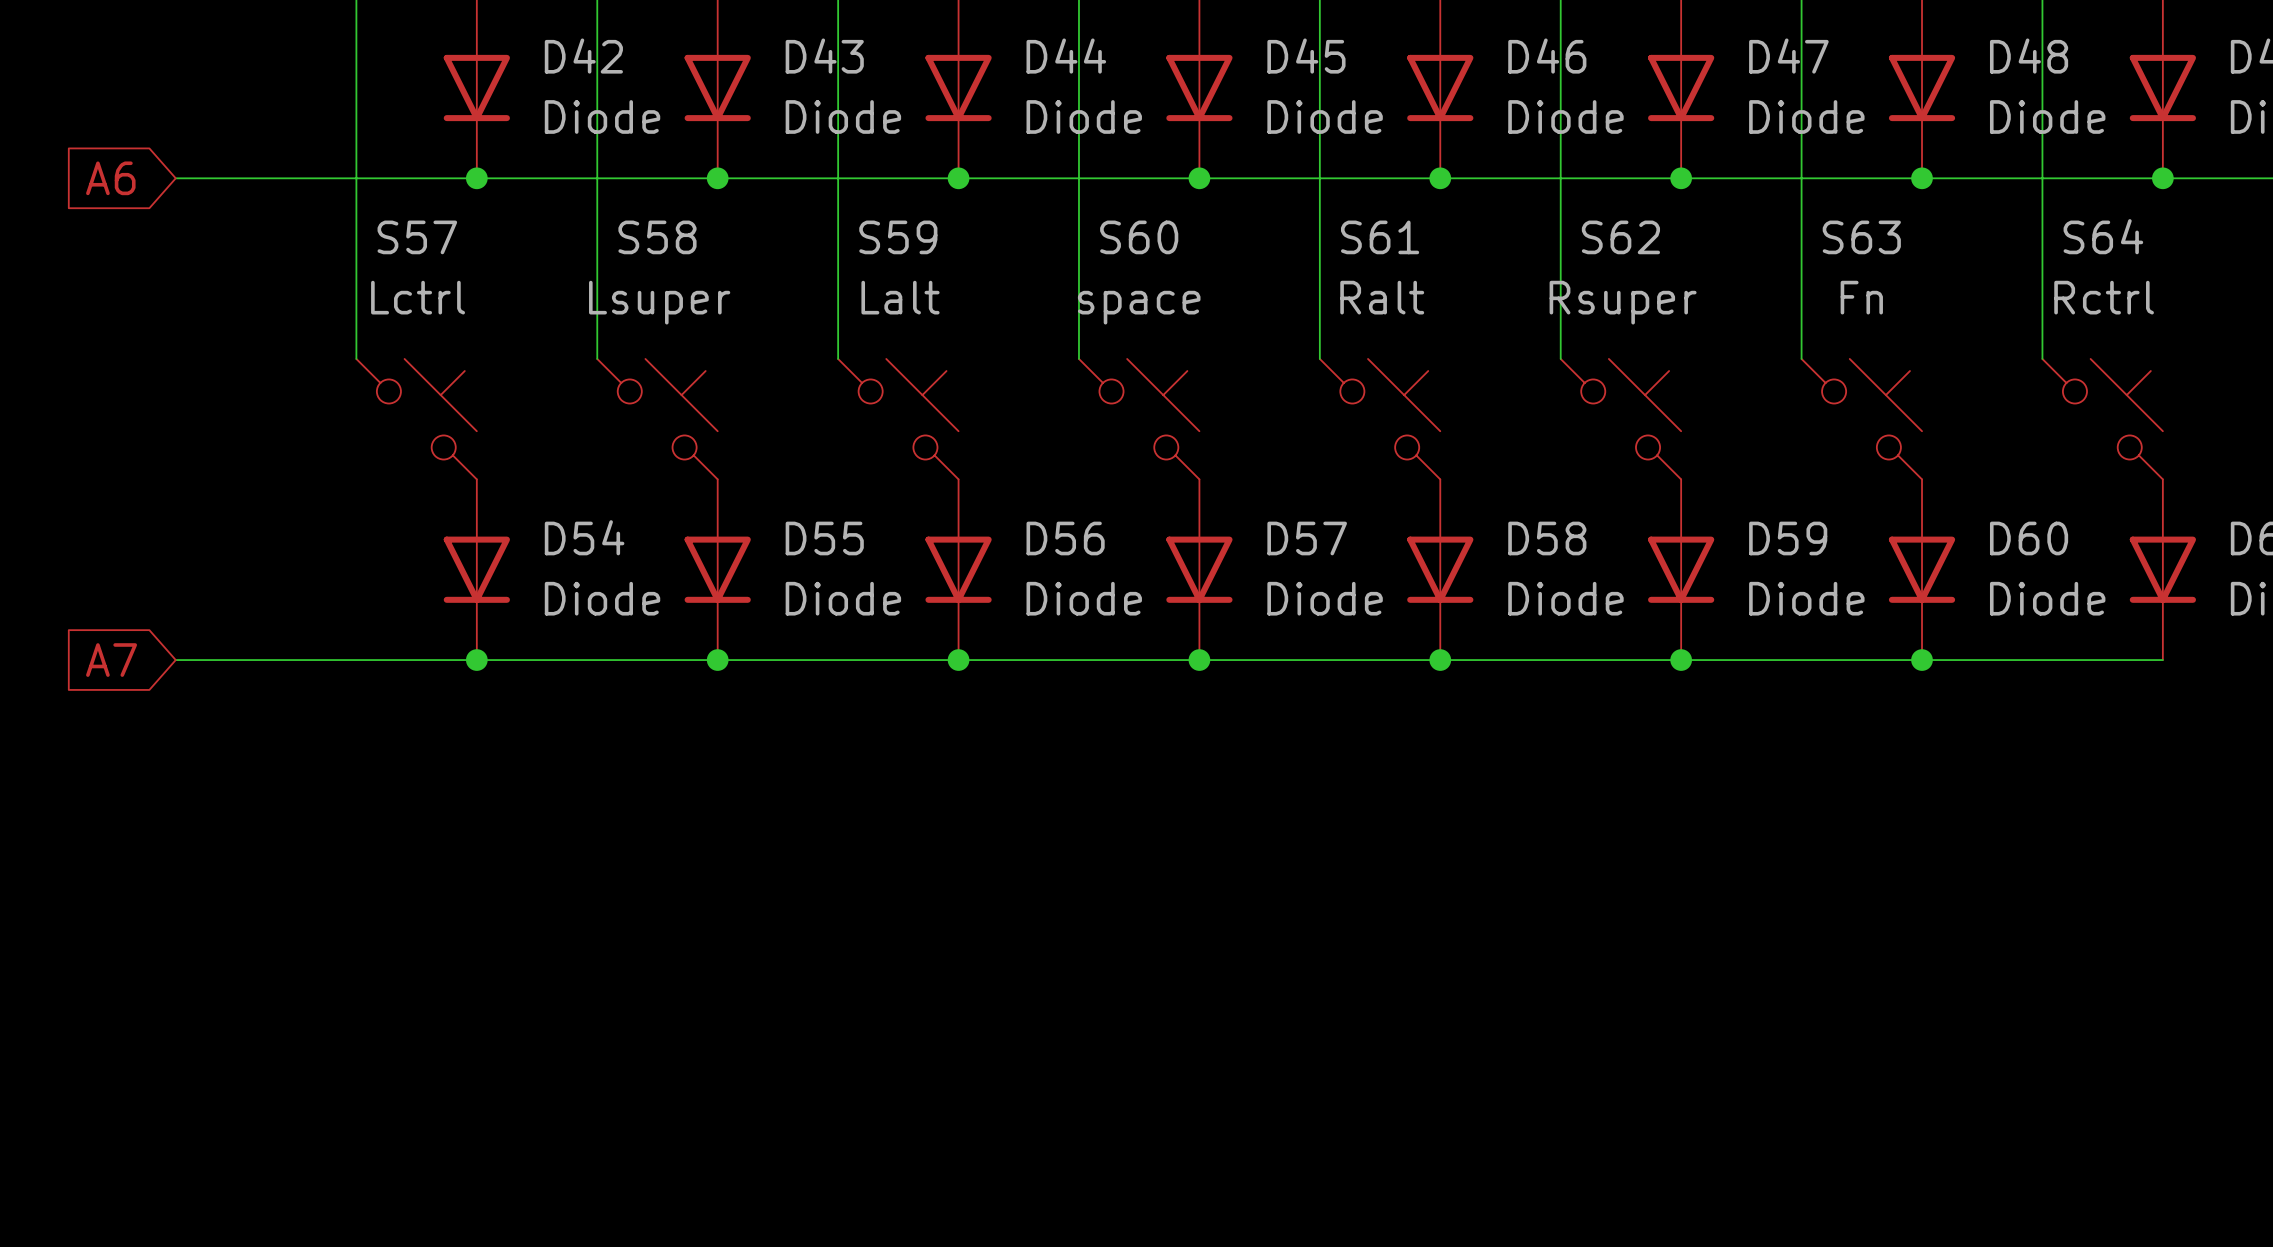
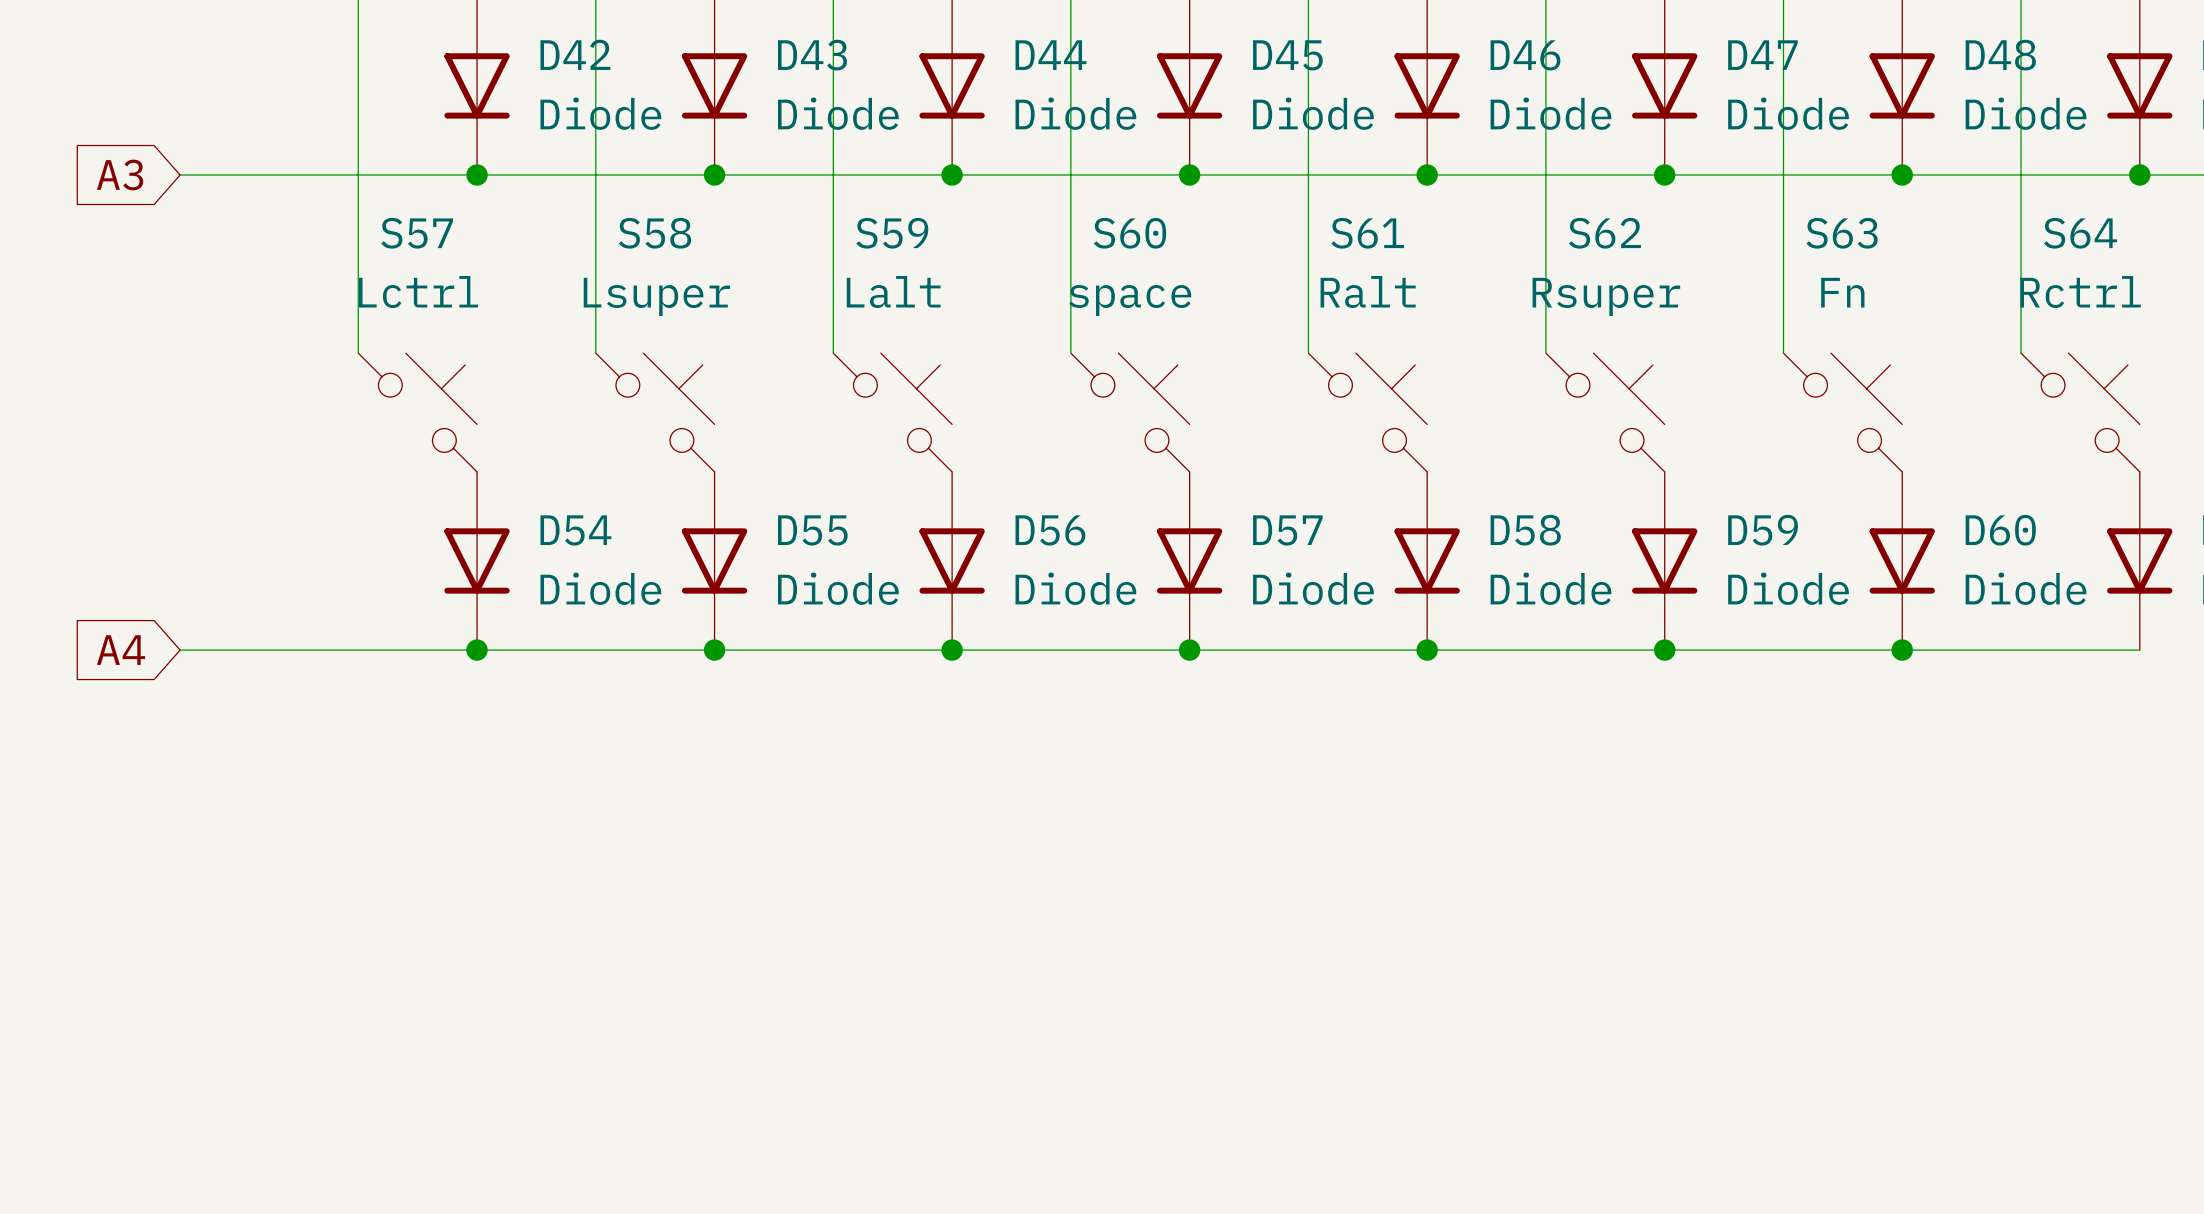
global label: A6 (110, 178) -> A3 (120, 174)
global label: A7 (111, 660) -> A4 (121, 650)

